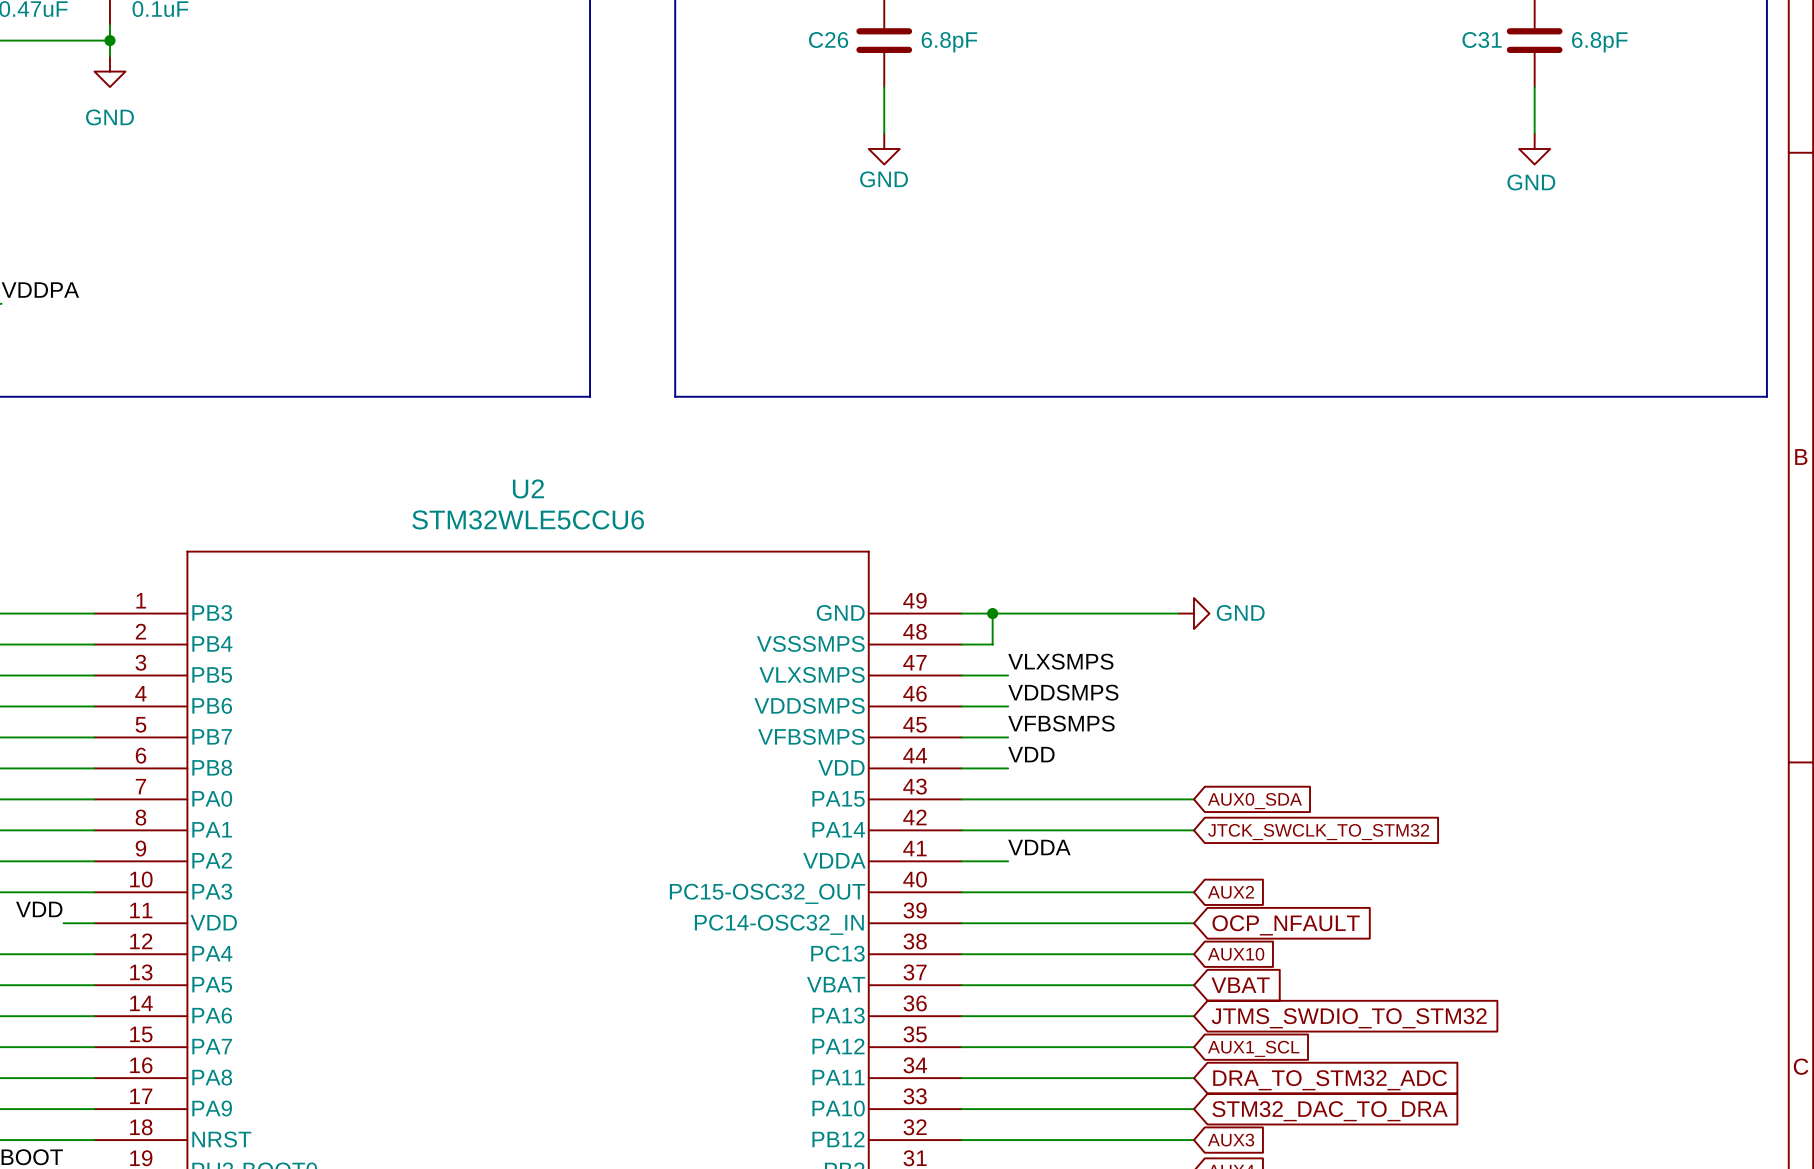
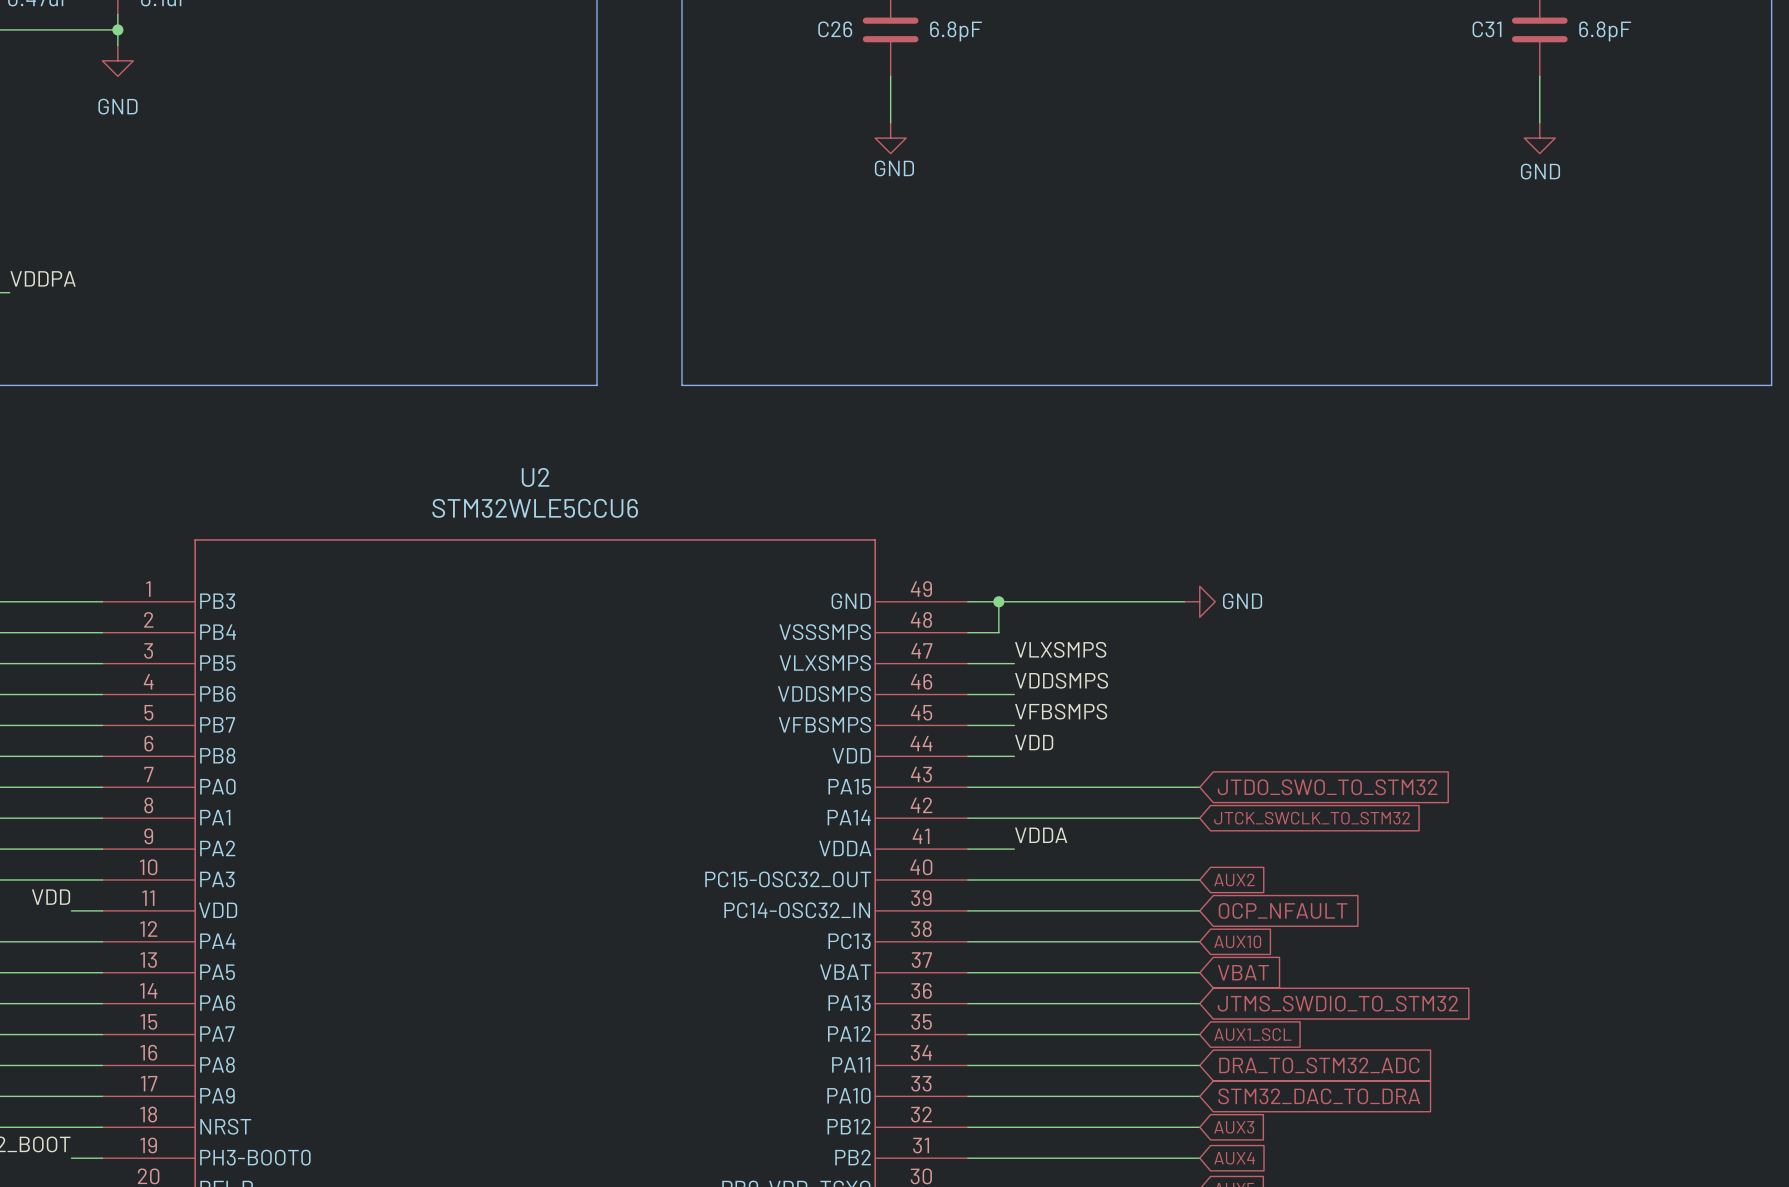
global label: AUX0_SDA (1254, 801) -> JTDO_SWO_TO_STM32 (1327, 787)

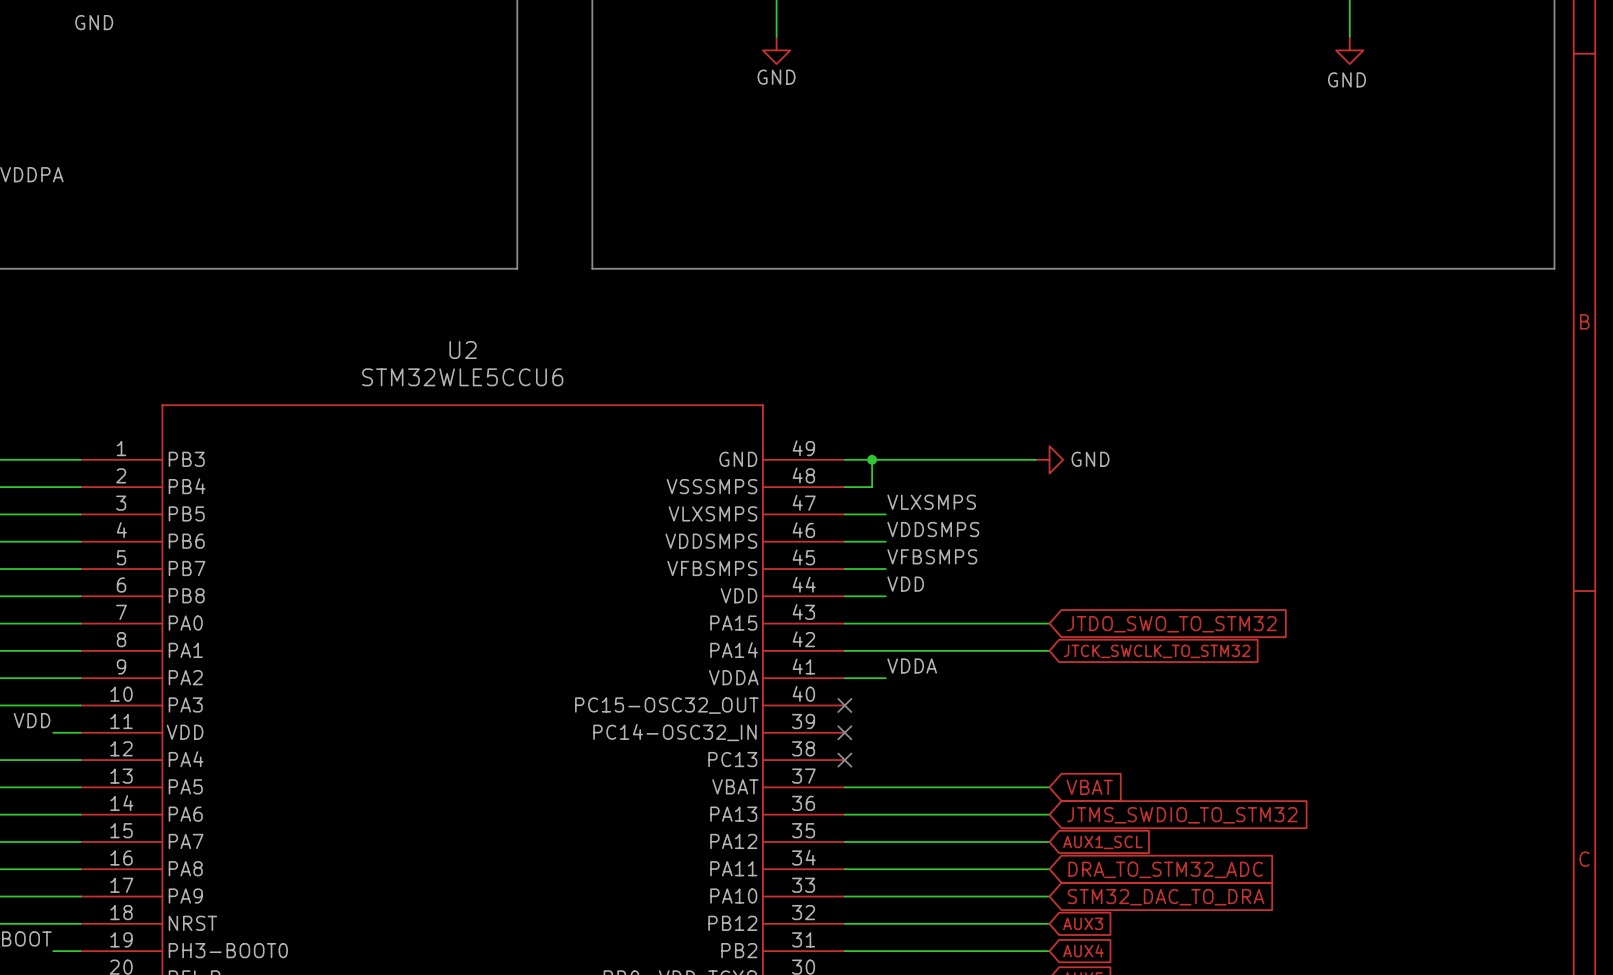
wire: (967, 879) (1199, 879) -> none
no-connect mark: none -> (844, 705)
global label: AUX2 (1234, 879) -> none
wire: (967, 910) (1199, 910) -> none
no-connect mark: none -> (844, 732)
global label: OCP_NFAULT (1283, 910) -> none
wire: (967, 941) (1199, 941) -> none
no-connect mark: none -> (844, 760)
global label: AUX10 (1237, 941) -> none

